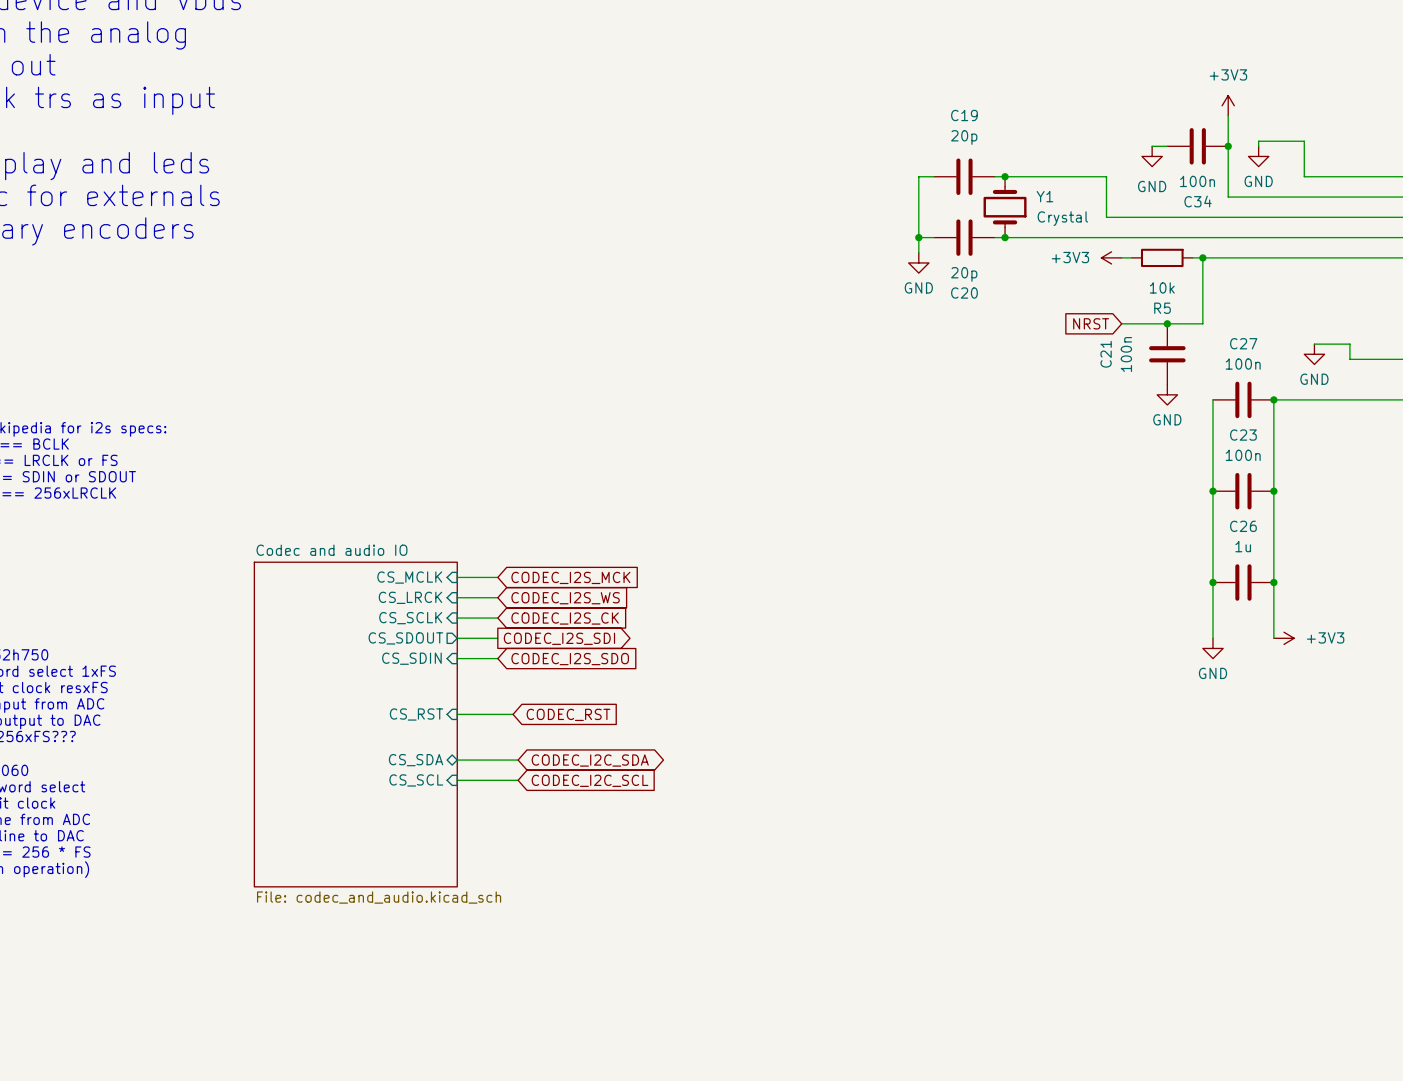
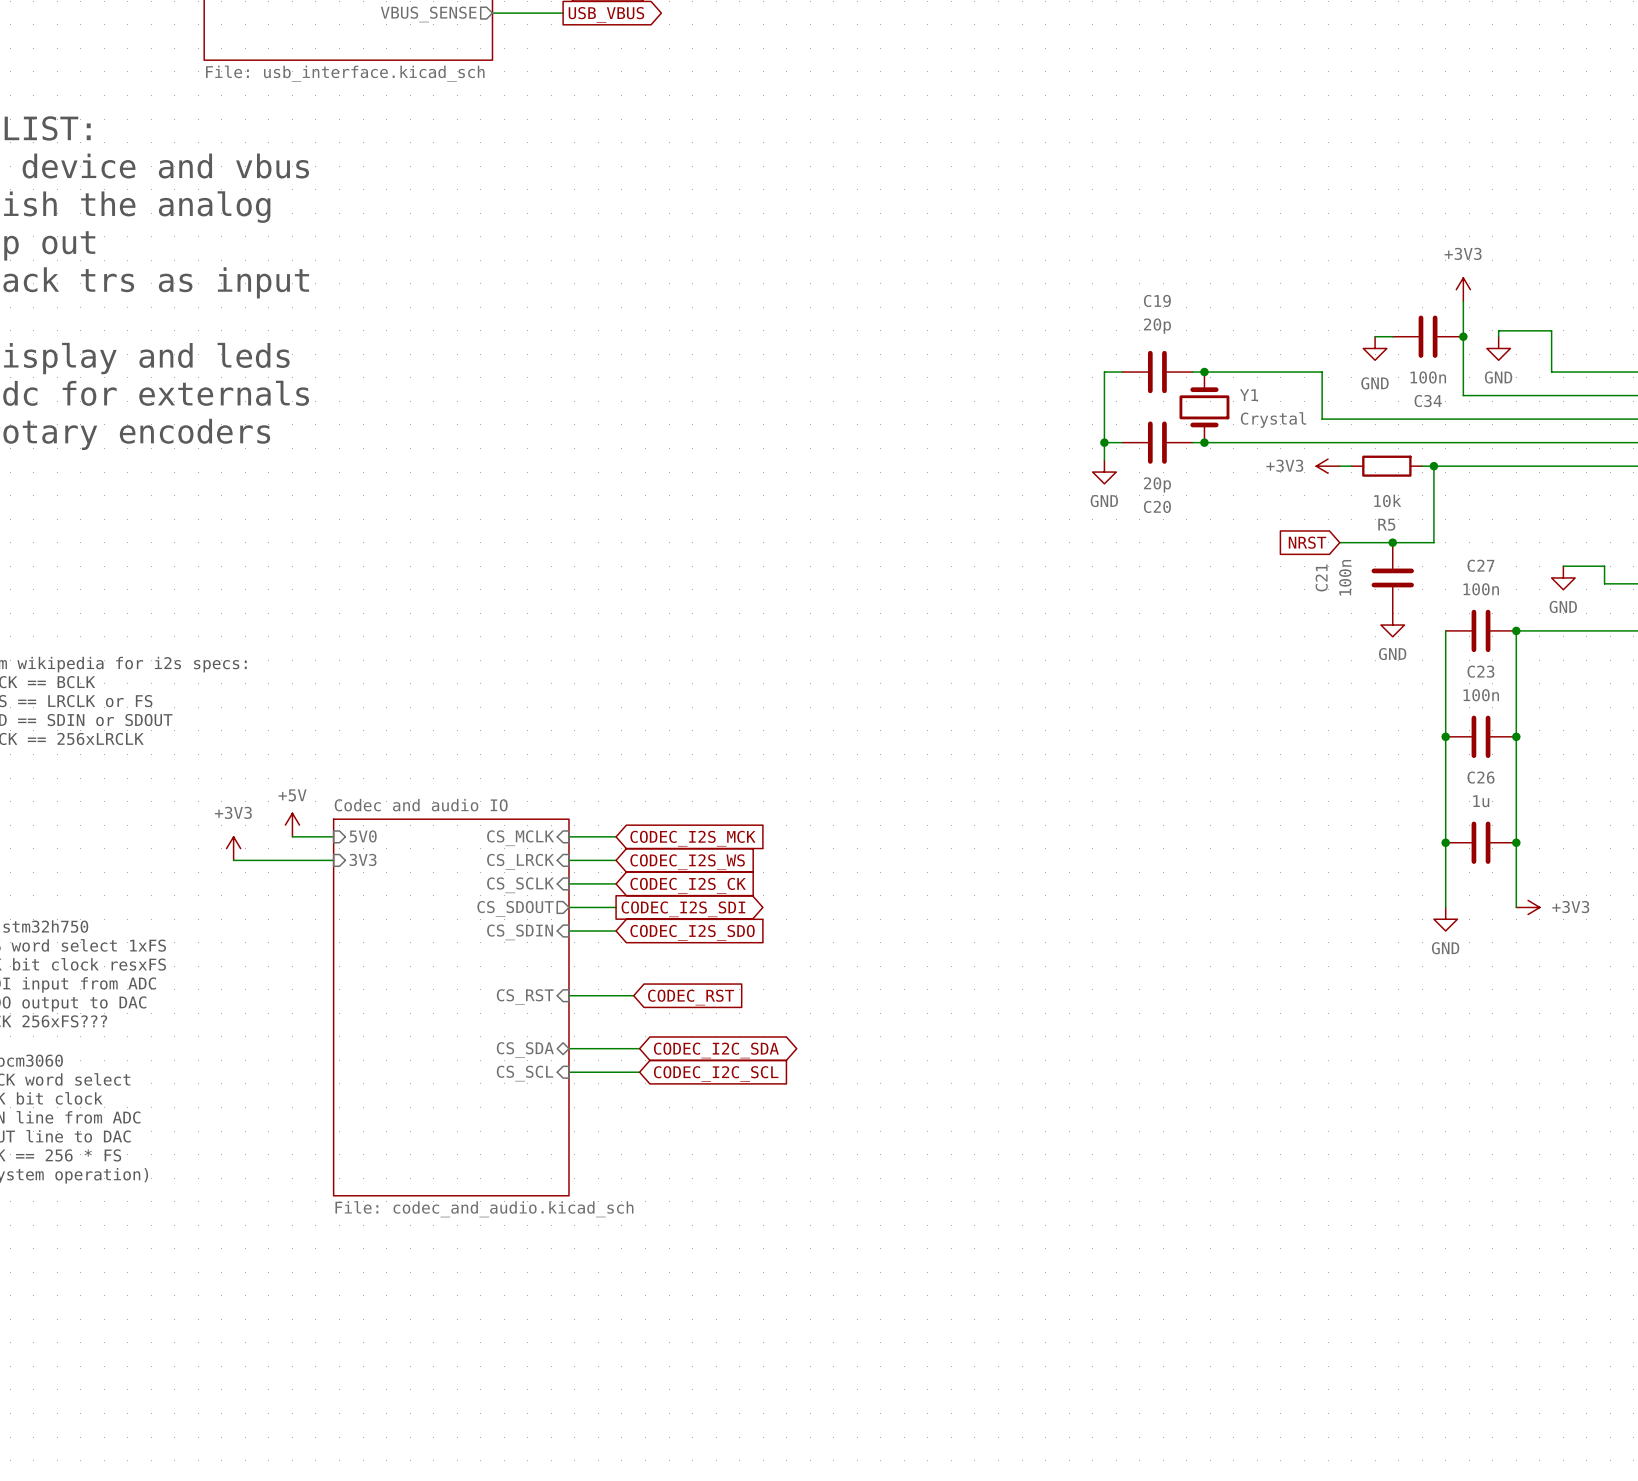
power symbol: none -> +5V (292, 825)
wire: none -> (292, 836) (333, 836)
sheet pin: none -> 5V0 (363, 836)
power symbol: none -> +3V3 (233, 848)
wire: none -> (233, 860) (333, 860)
sheet pin: none -> 3V3 (363, 859)

